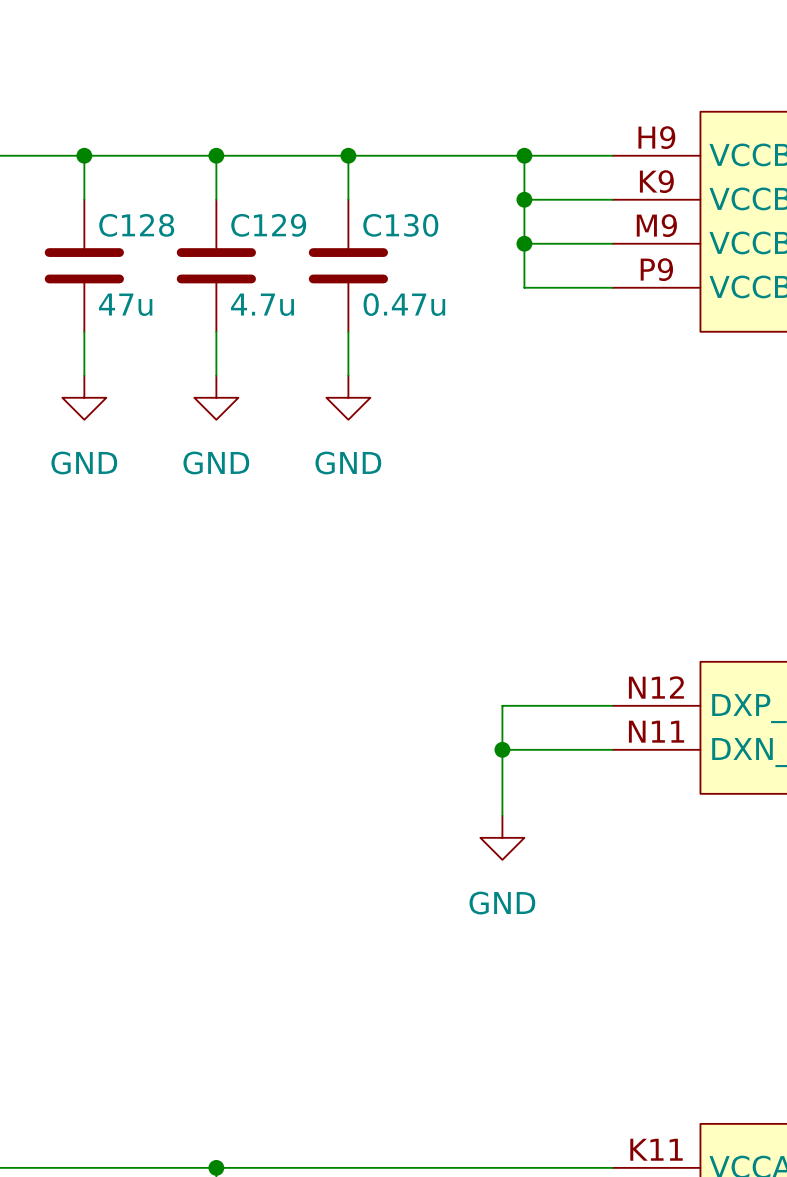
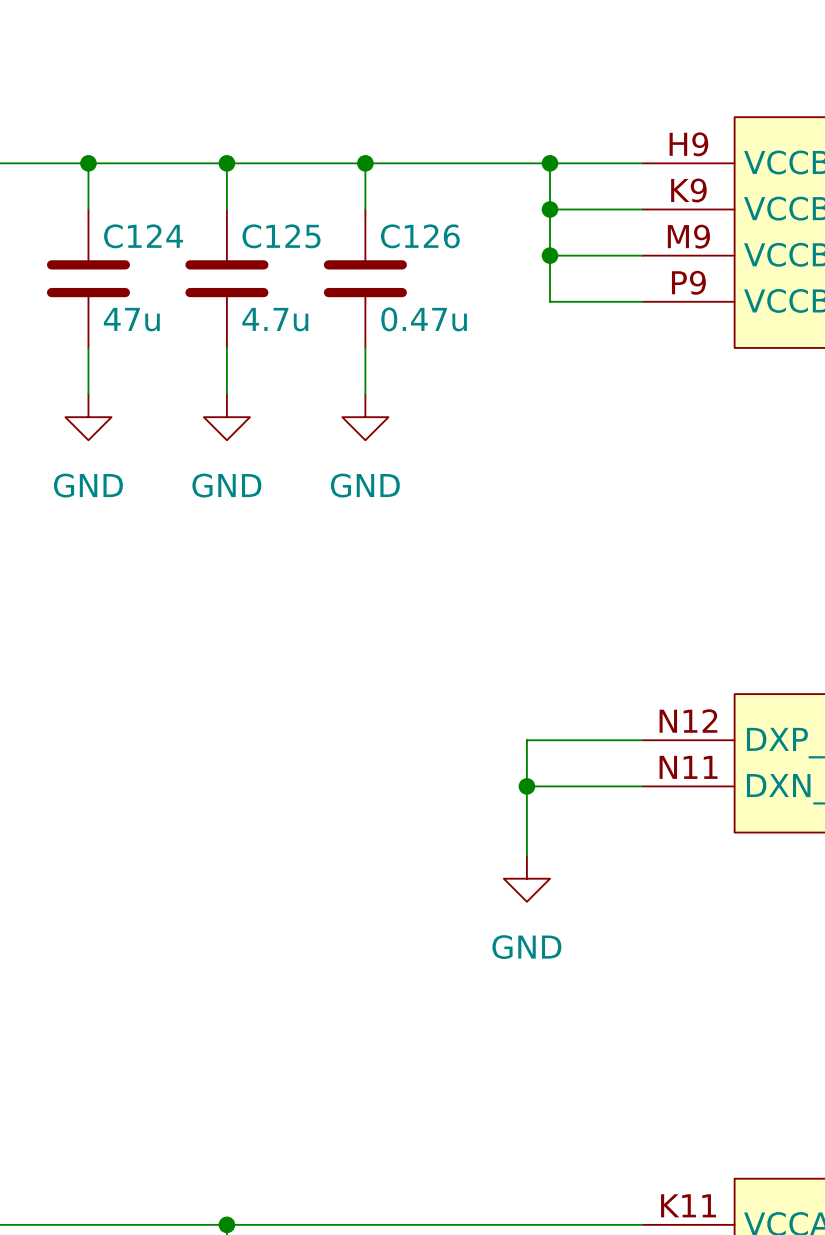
C128 name: C128 (136, 225) -> C124 (143, 236)
C129 name: C129 (268, 225) -> C125 (281, 236)
C130 name: C130 (400, 225) -> C126 (420, 236)

